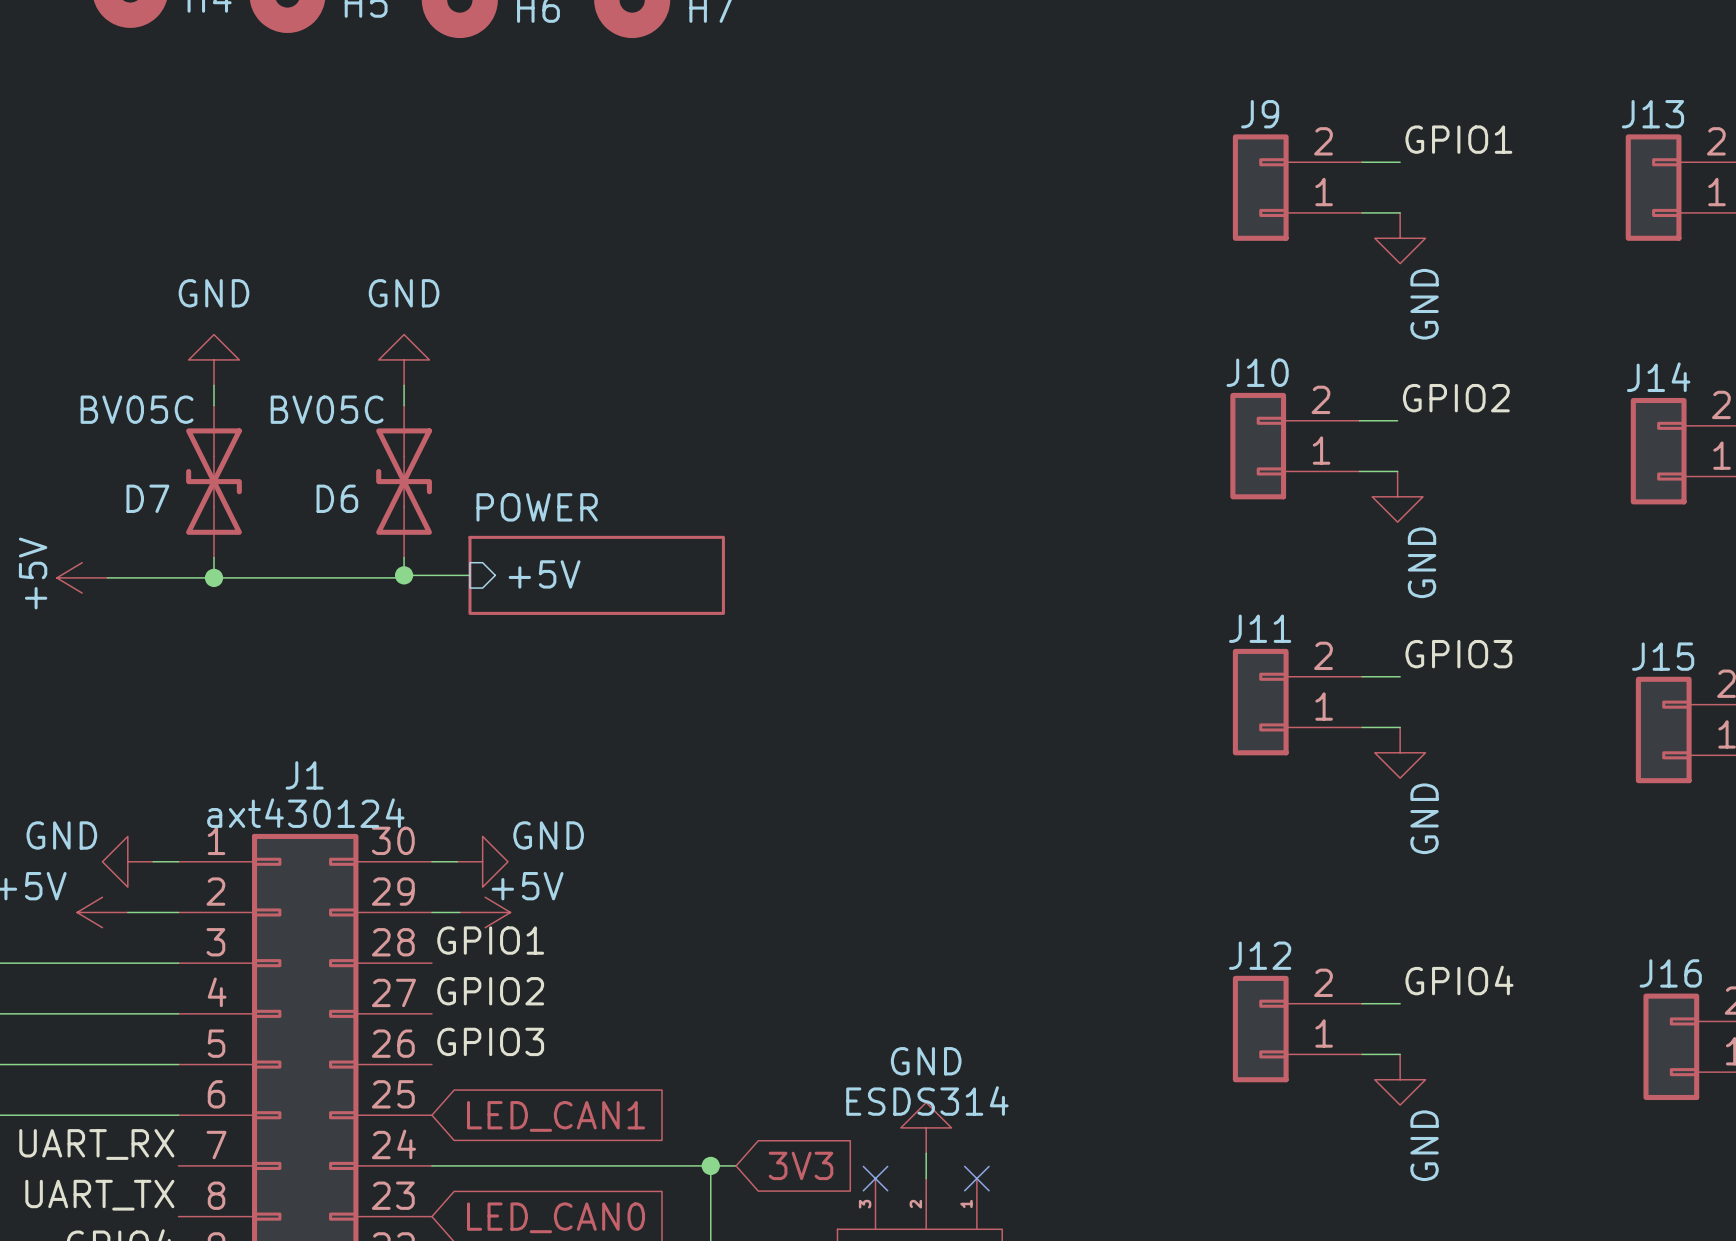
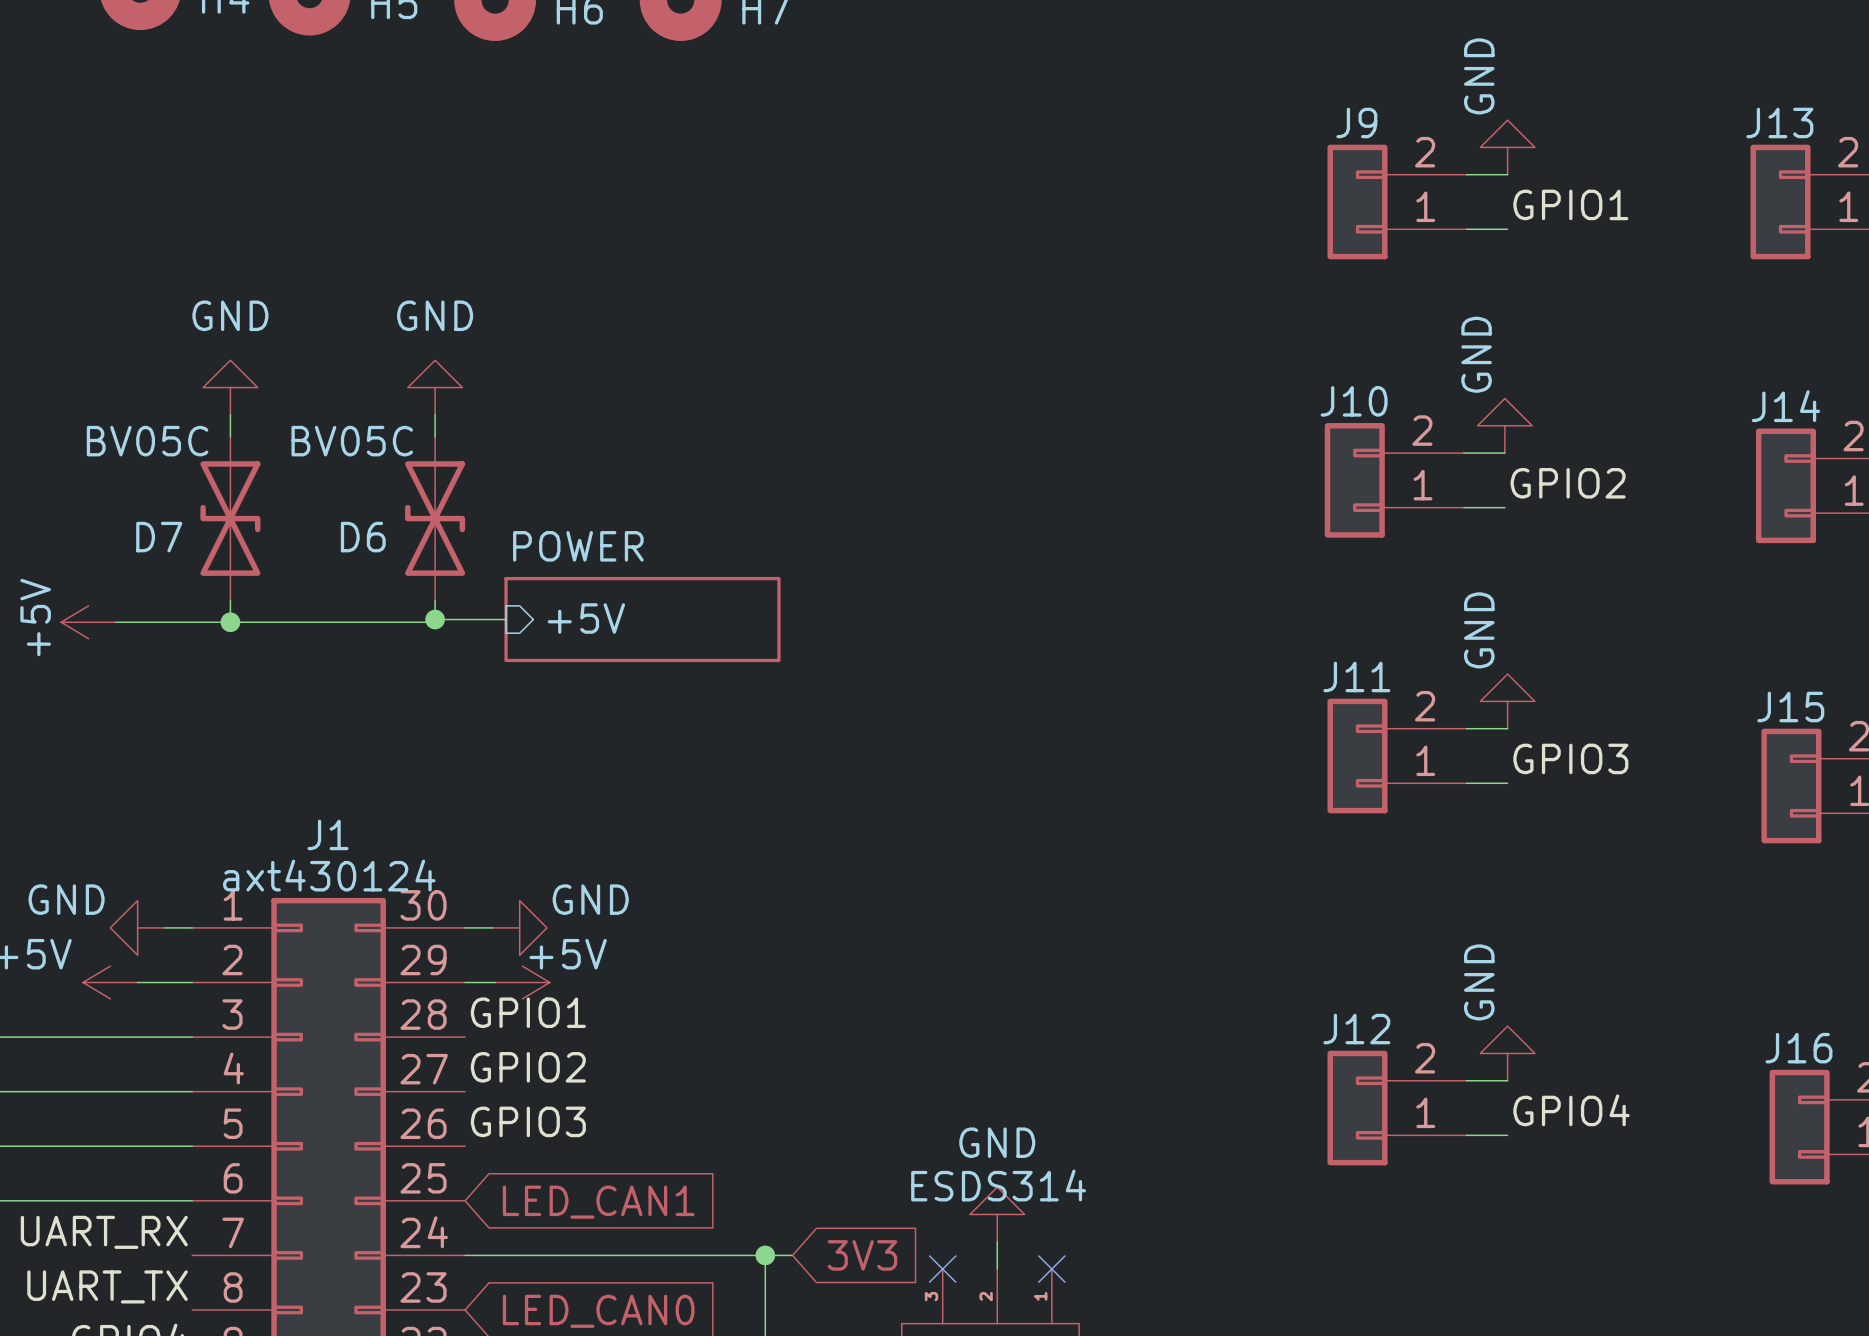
power symbol: none -> GND (1507, 147)
label position: GPIO1 (1458, 139) -> GPIO1 (1570, 204)
power symbol: GND (1400, 238) -> none
power symbol: none -> GND (1504, 425)
label position: GPIO2 (1456, 398) -> GPIO2 (1568, 483)
power symbol: GND (1397, 496) -> none
power symbol: none -> GND (1507, 701)
label position: GPIO3 (1458, 654) -> GPIO3 (1570, 758)
power symbol: GND (1400, 752) -> none
label position: GPIO4 (1459, 980) -> GPIO4 (1571, 1110)
power symbol rotation: 0° (1400, 1079) -> 180° (1507, 1053)
power symbol position: GND (1400, 1079) -> GND (1507, 1053)

